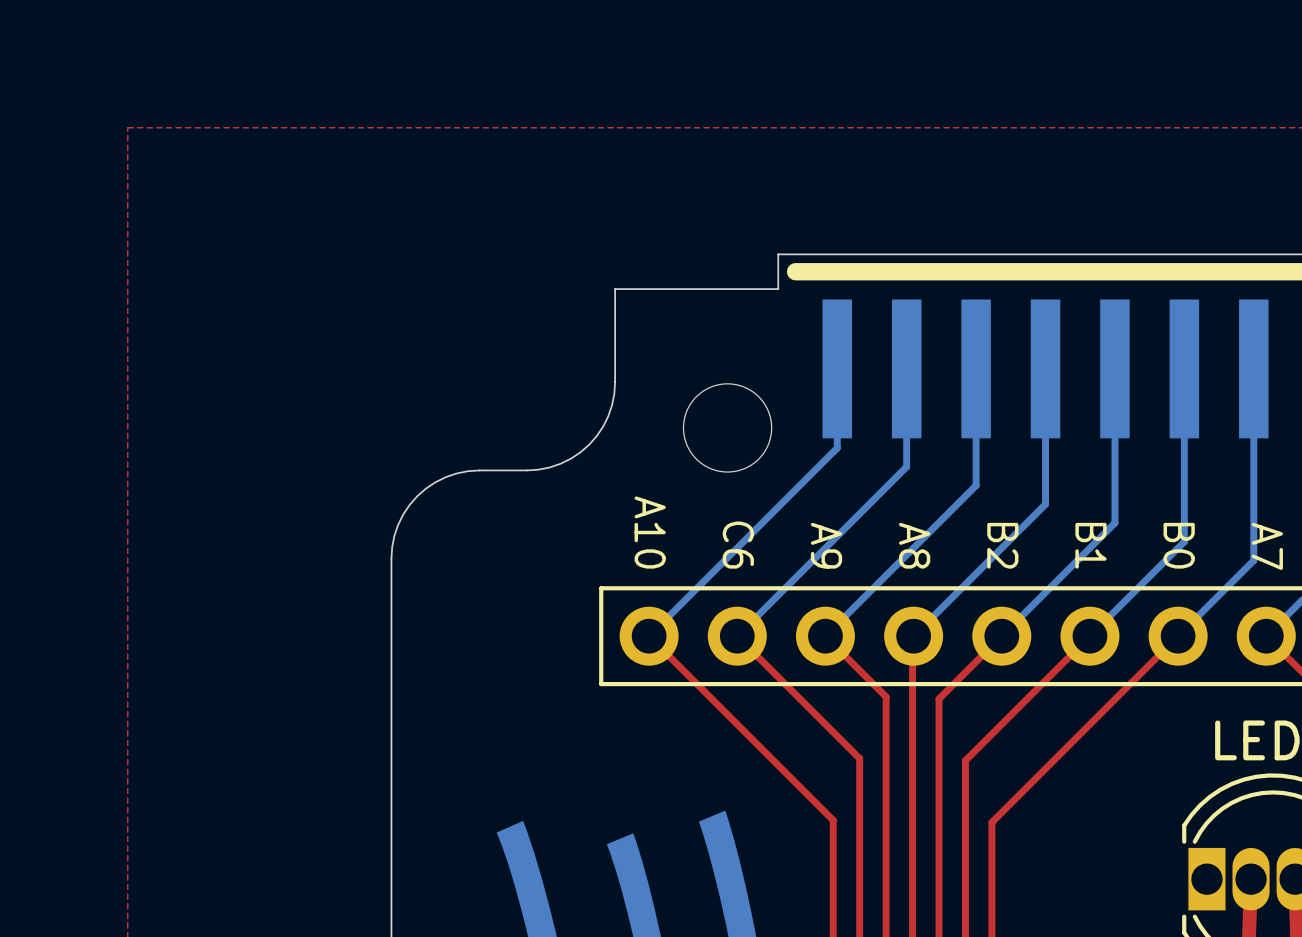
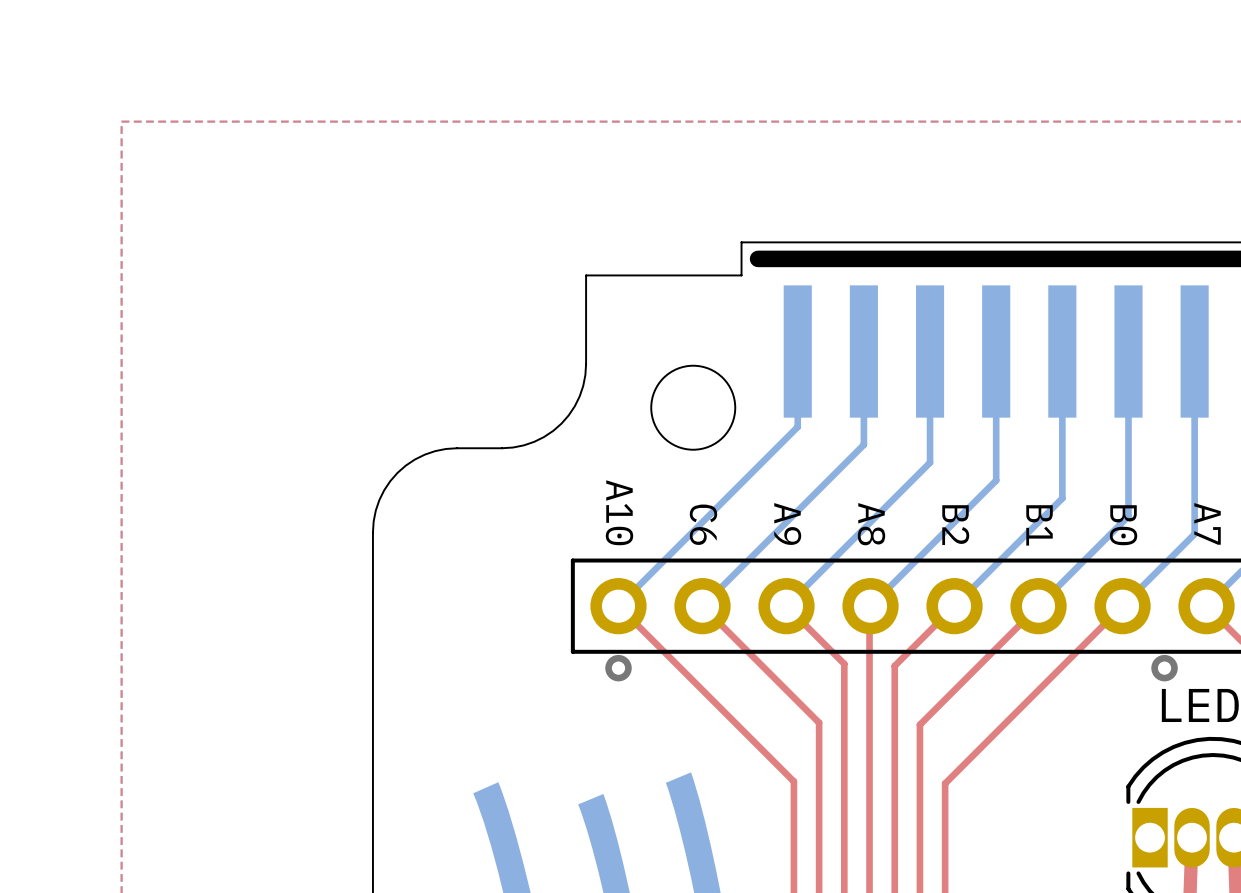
via: none -> (618, 668)
via: none -> (1164, 668)

